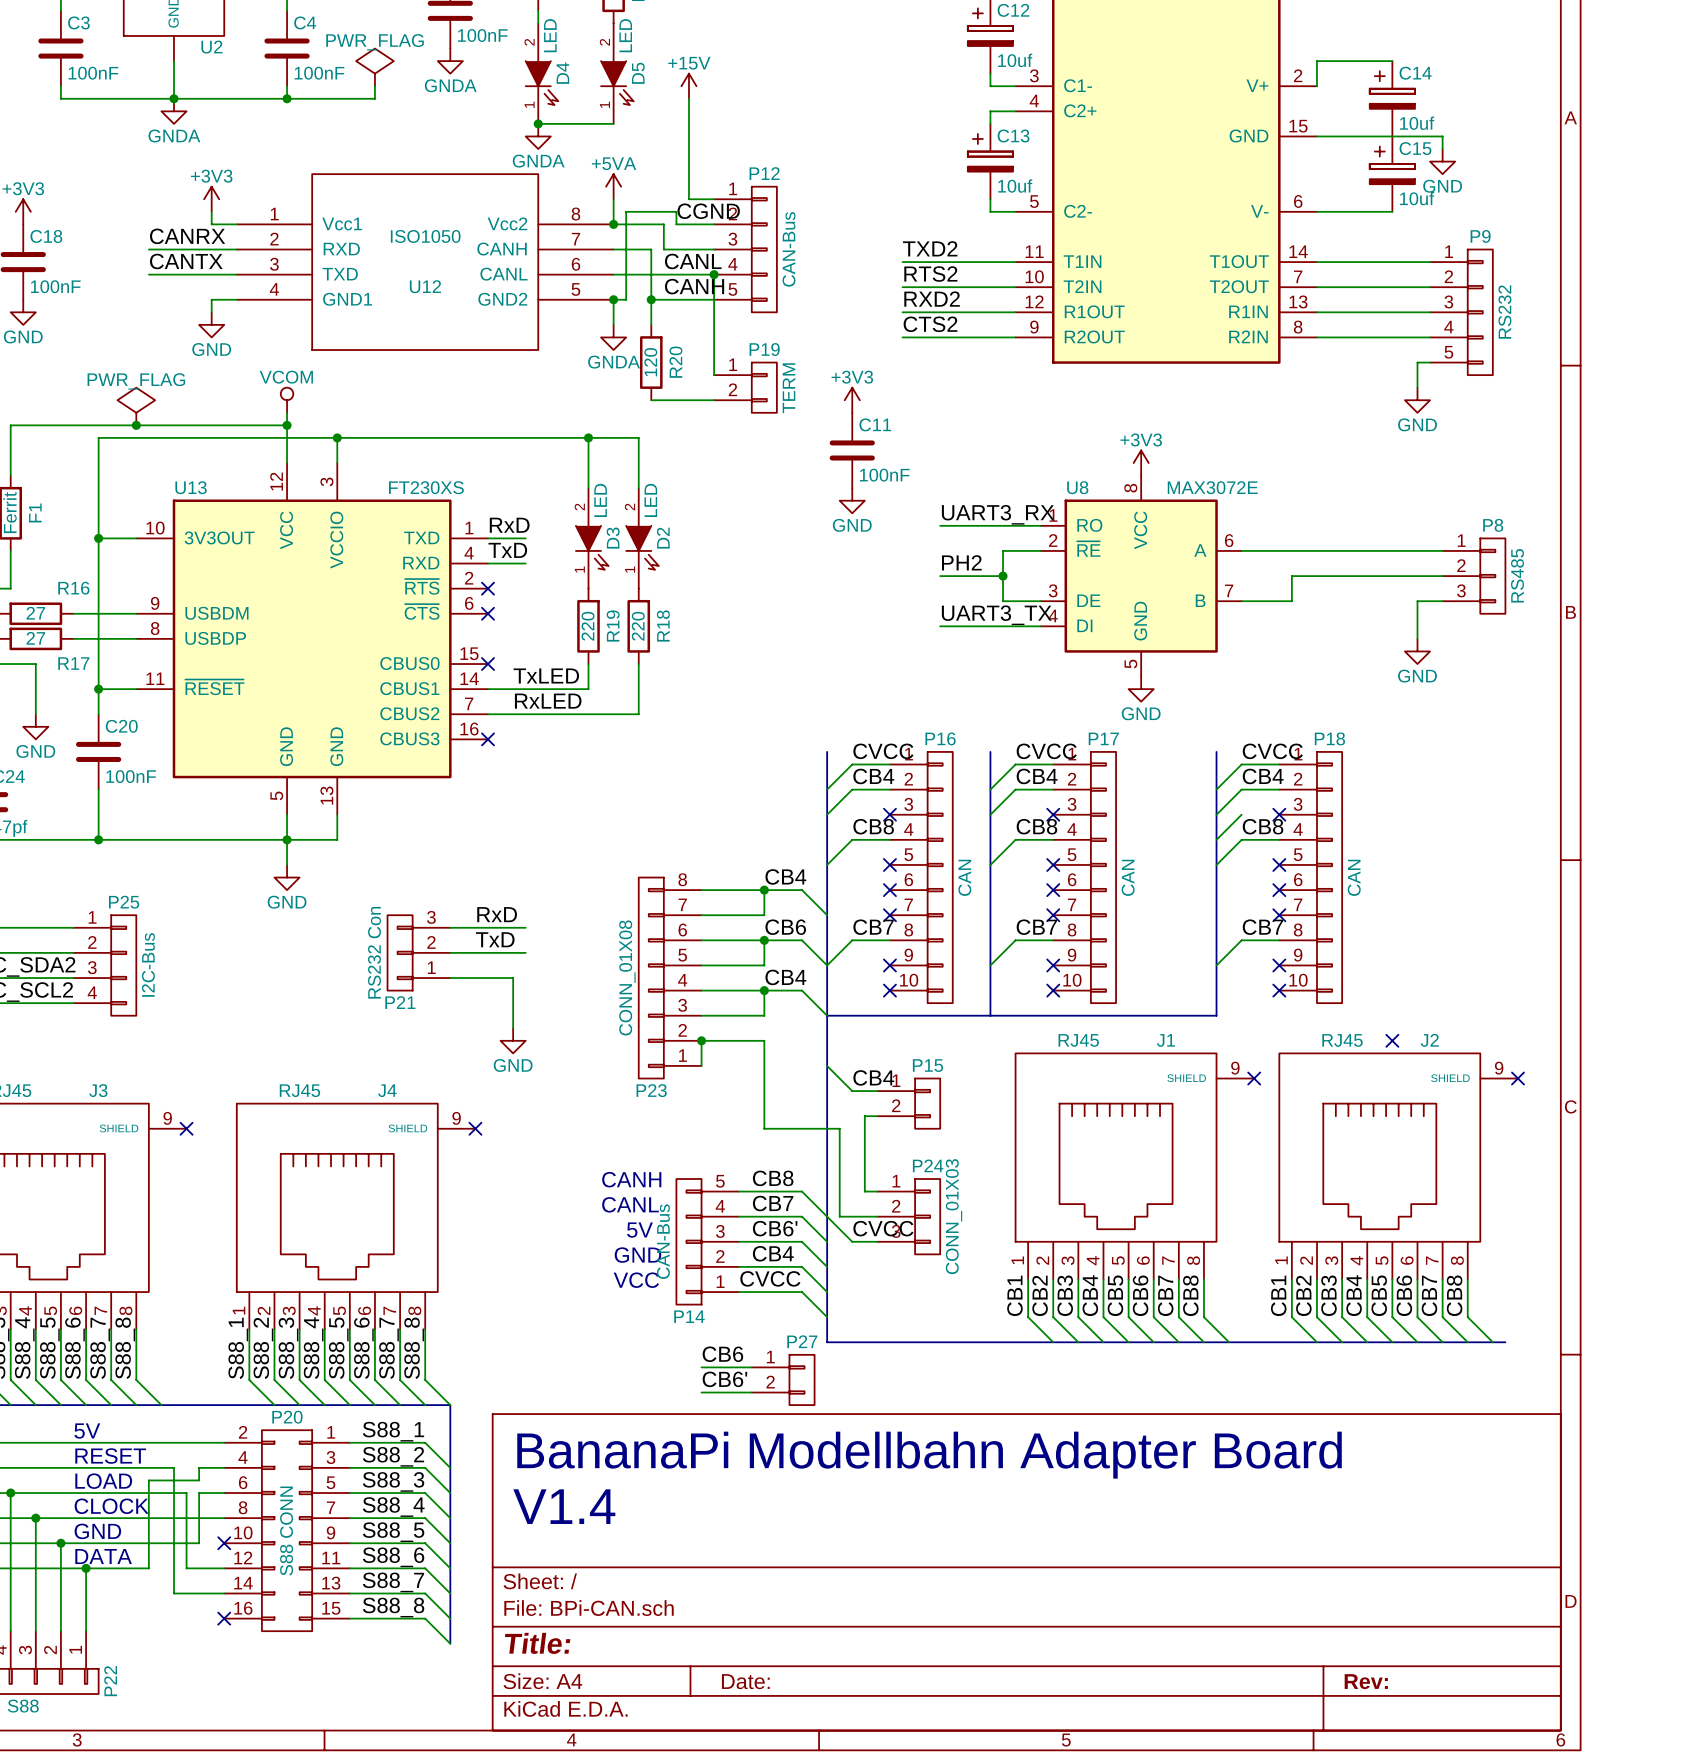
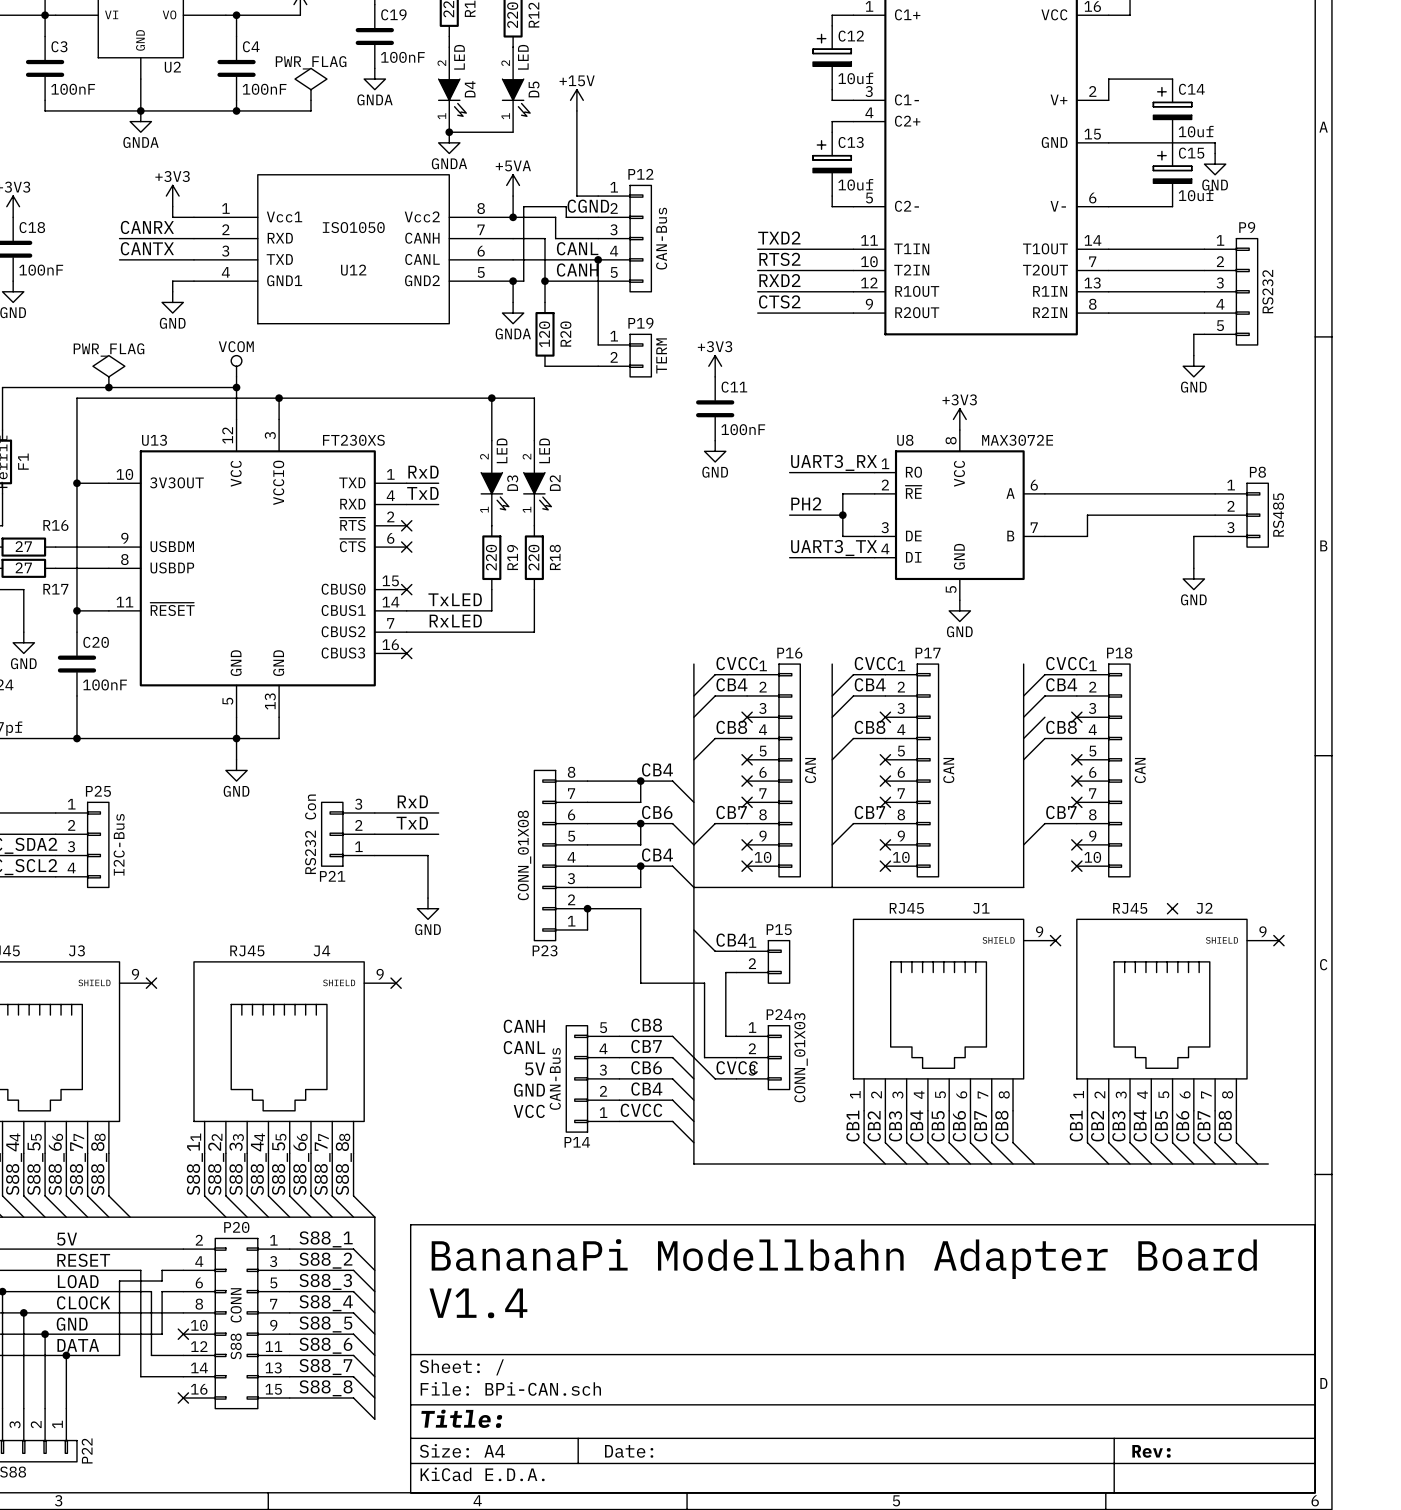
label: CB6' (775, 1228) -> CB6 (646, 1067)
label: CB6 (722, 1354) -> none
wire: (701, 1367) (751, 1367) -> none
label: CB6' (724, 1379) -> none
P27: (783, 1379) -> none
wire: (701, 1392) (751, 1392) -> none

